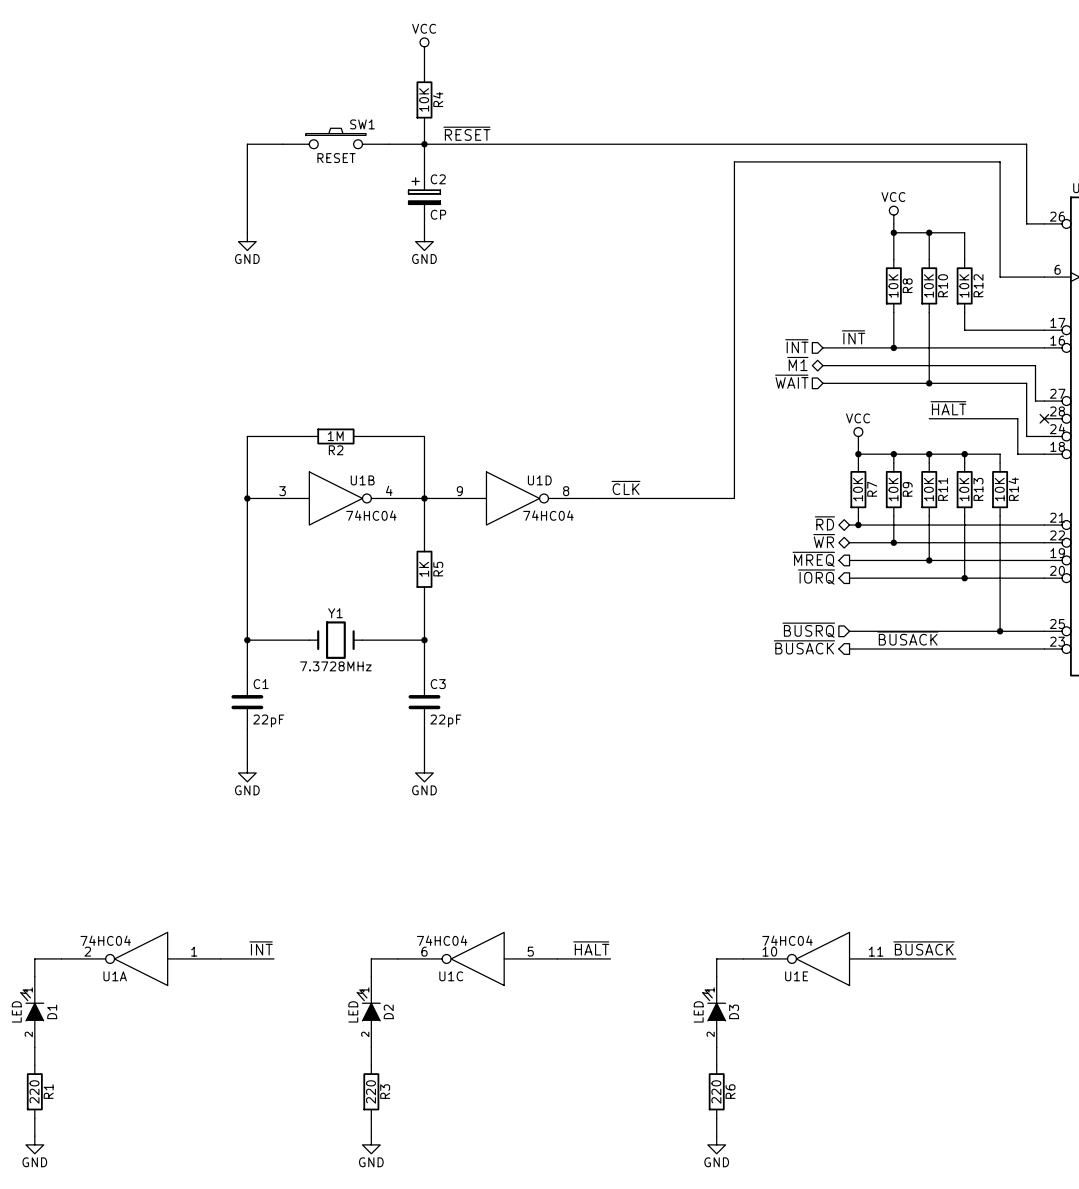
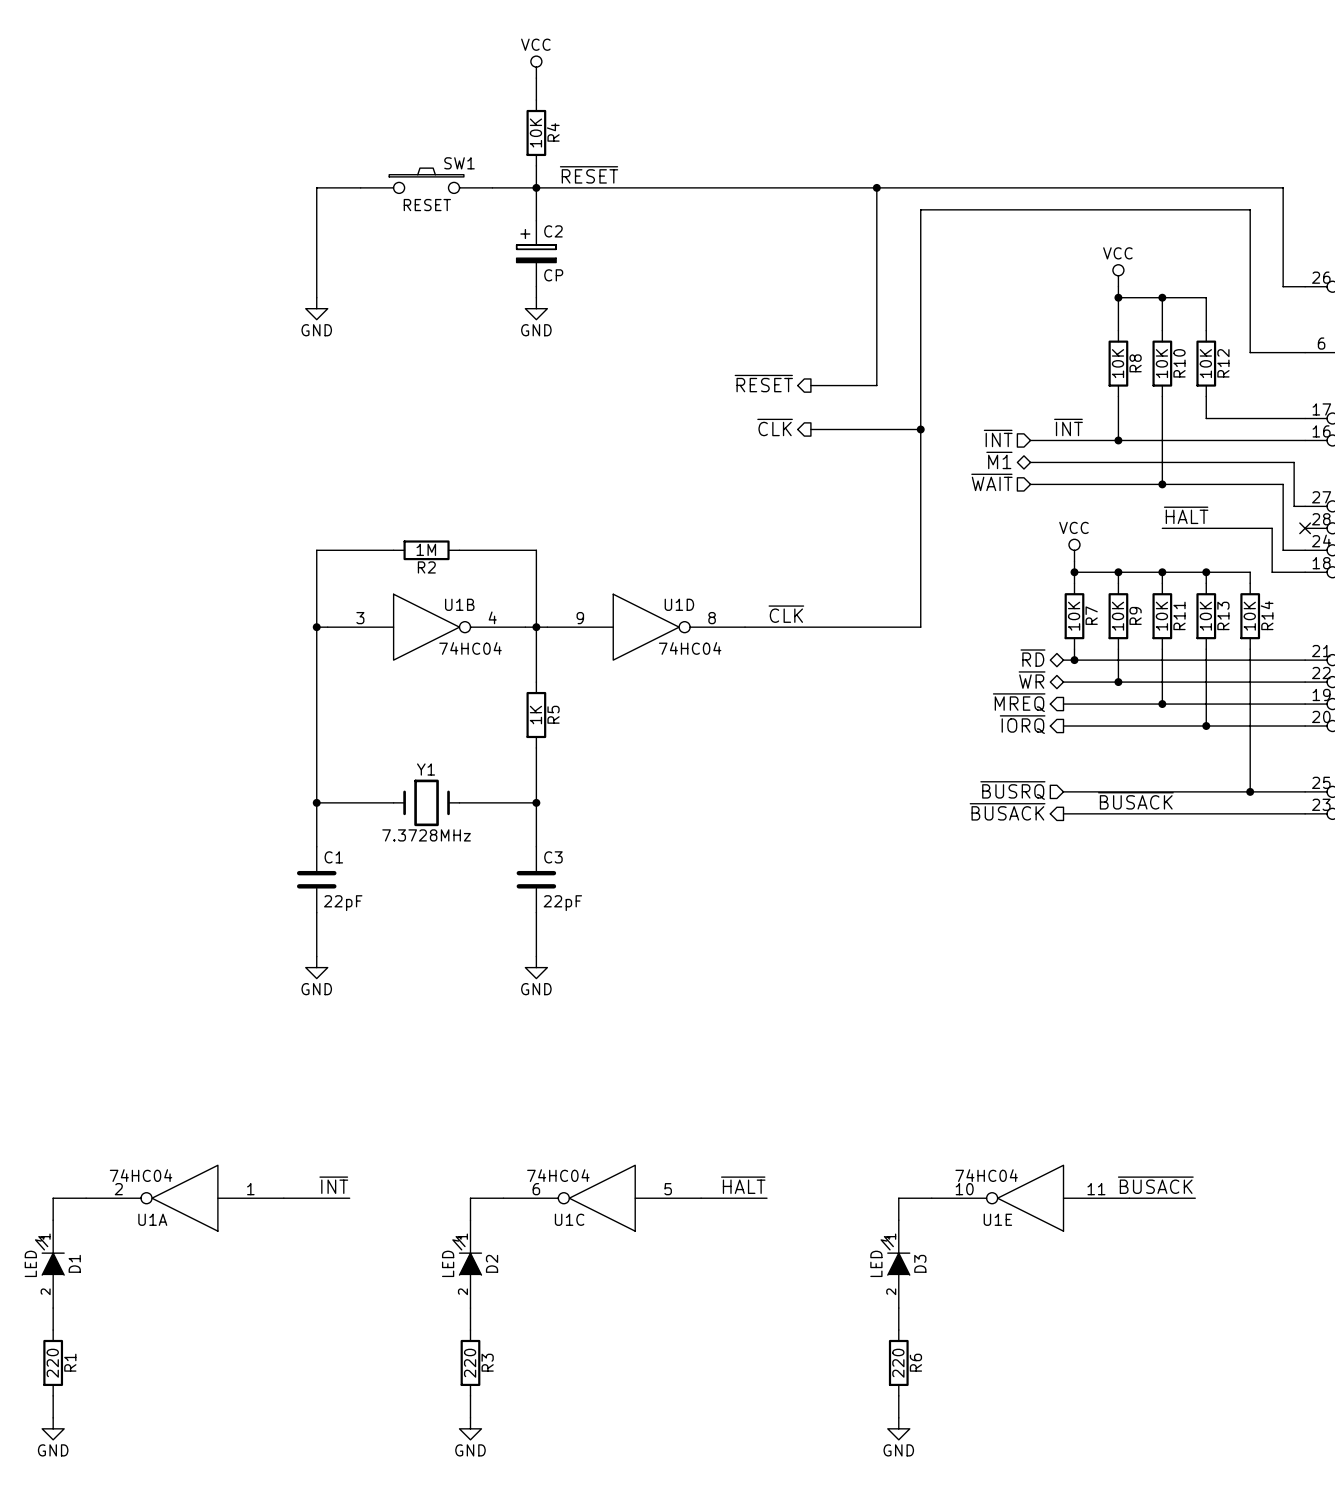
wire: none -> (876, 187) (876, 385) (810, 385)
junction: none -> (876, 187)
hierarchical label: none -> ~{RESET} (763, 383)
hierarchical label: none -> ~{CLK} (775, 427)
wire: none -> (810, 429) (920, 429)
junction: none -> (920, 429)

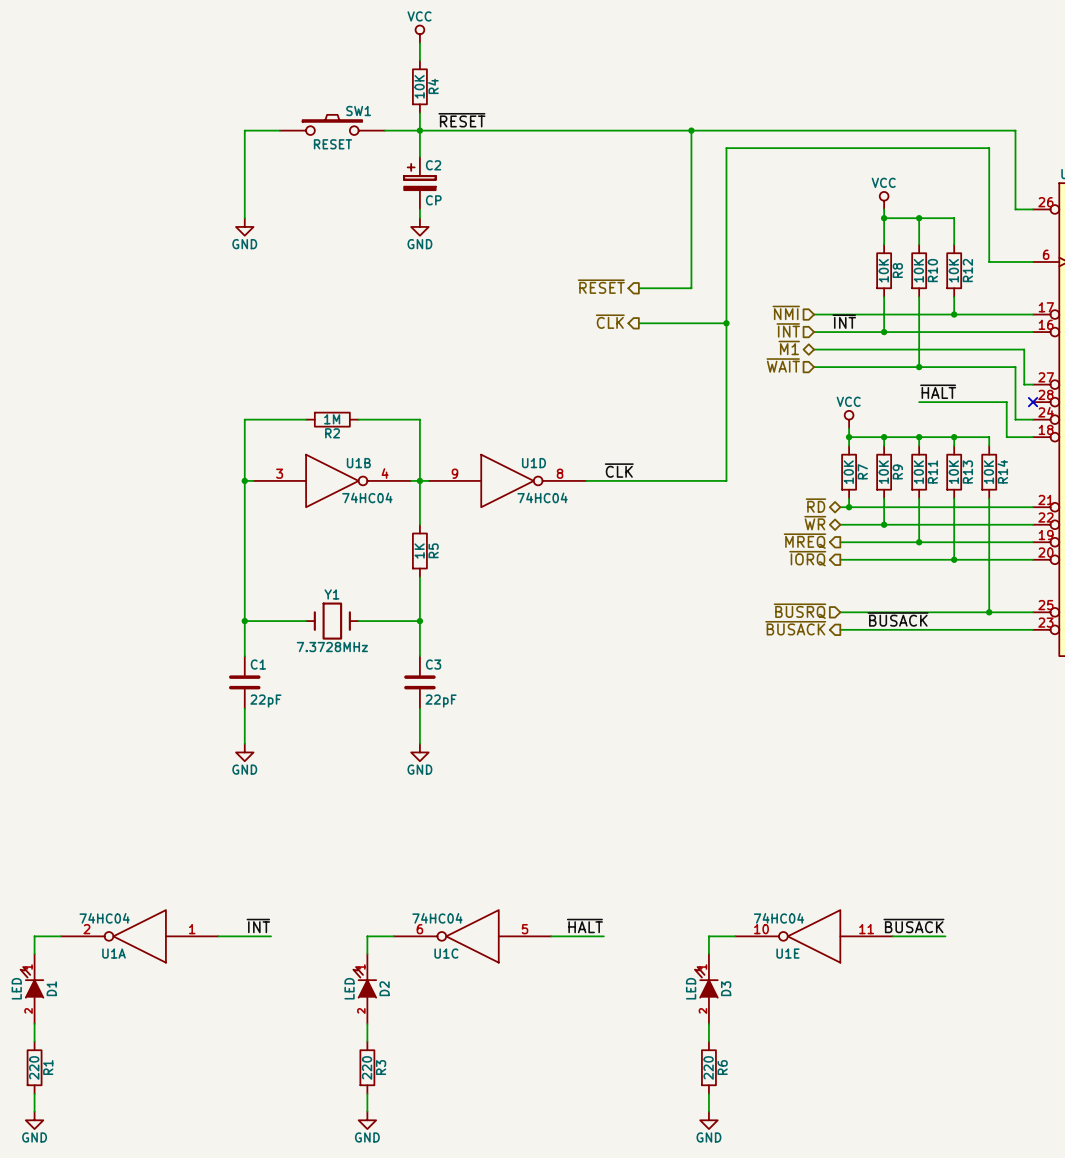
hierarchical label: none -> ~{NMI} (786, 312)
wire: none -> (814, 314) (954, 314)
junction: none -> (954, 314)

